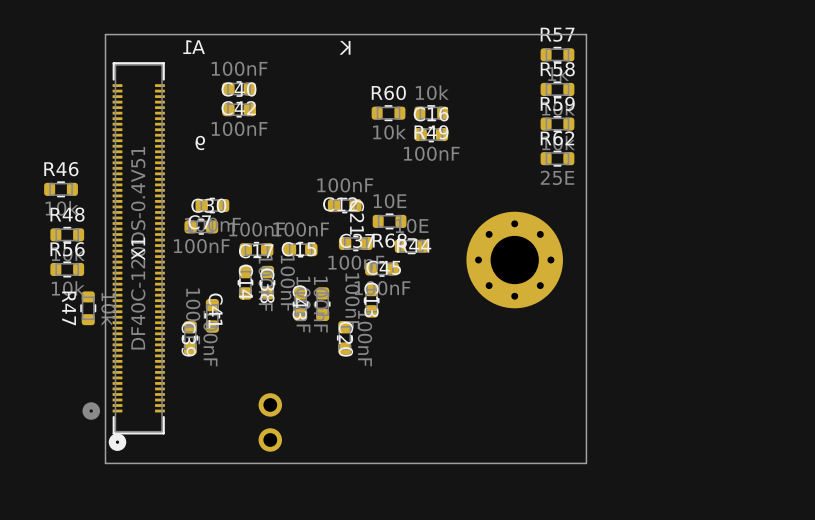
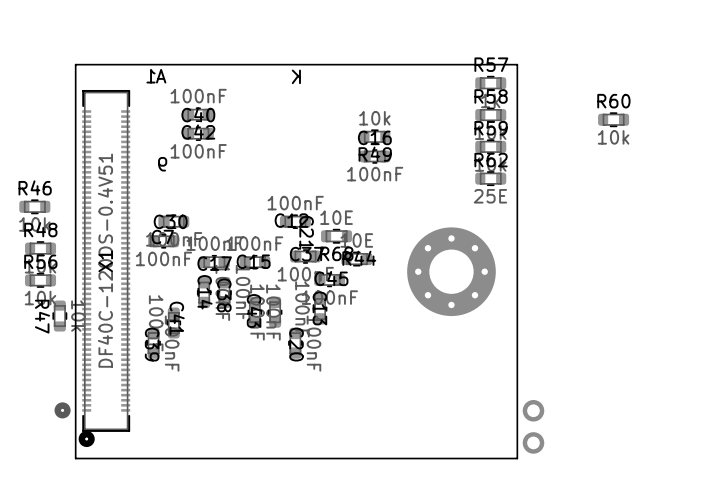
R60 position: (388, 113) -> (613, 119)
part position: (270, 422) -> (533, 426)

